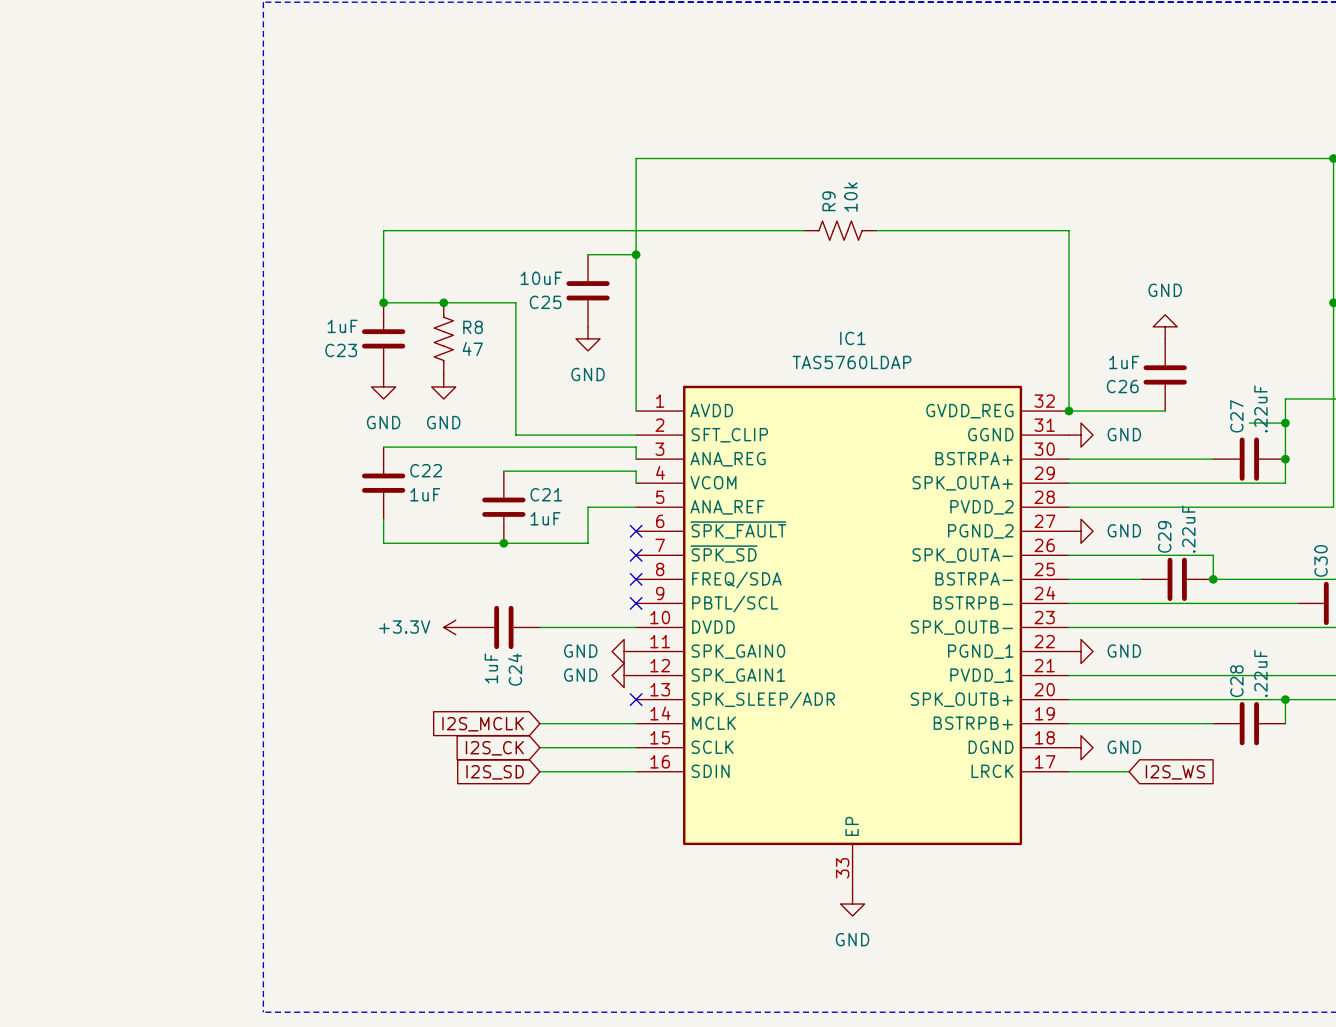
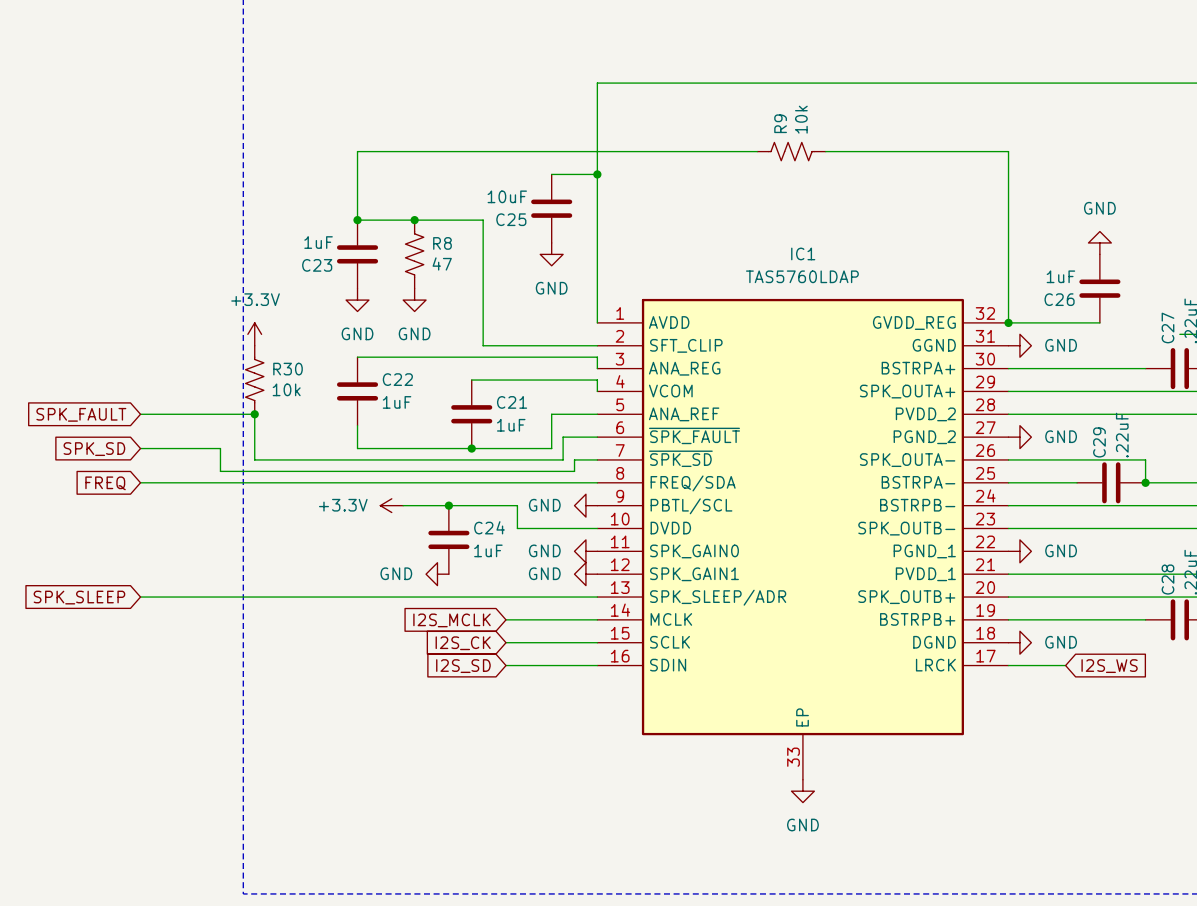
power symbol: none -> +3.3V (254, 334)
R30: none -> 10k (254, 380)
global label: none -> SPK_FAULT (81, 414)
wire: none -> (140, 414) (254, 414) (254, 459) (563, 459) (563, 437) (597, 437)
junction: none -> (254, 414)
no-connect mark: (636, 531) -> none
global label: none -> SPK_SD (94, 449)
wire: none -> (140, 448) (220, 448) (220, 471) (574, 471) (574, 459) (597, 459)
no-connect mark: (636, 555) -> none
global label: none -> FREQ (105, 483)
wire: none -> (140, 482) (597, 482)
no-connect mark: (636, 579) -> none
junction: none -> (448, 505)
power symbol: none -> GND (585, 505)
no-connect mark: (636, 603) -> none
power symbol position: +3.3V (455, 627) -> +3.3V (391, 505)
C24 rotation: 0° (503, 627) -> 90° clockwise (448, 539)
wire: (539, 627) (551, 627) -> (403, 505) (517, 505) (517, 528)
C24 value position: 1uF (491, 668) -> 1uF (488, 550)
C24 name position: C24 (515, 669) -> C24 (489, 527)
power symbol: none -> GND (437, 574)
wire: none -> (140, 597) (597, 597)
no-connect mark: (636, 699) -> none
global label: none -> SPK_SLEEP (79, 597)

